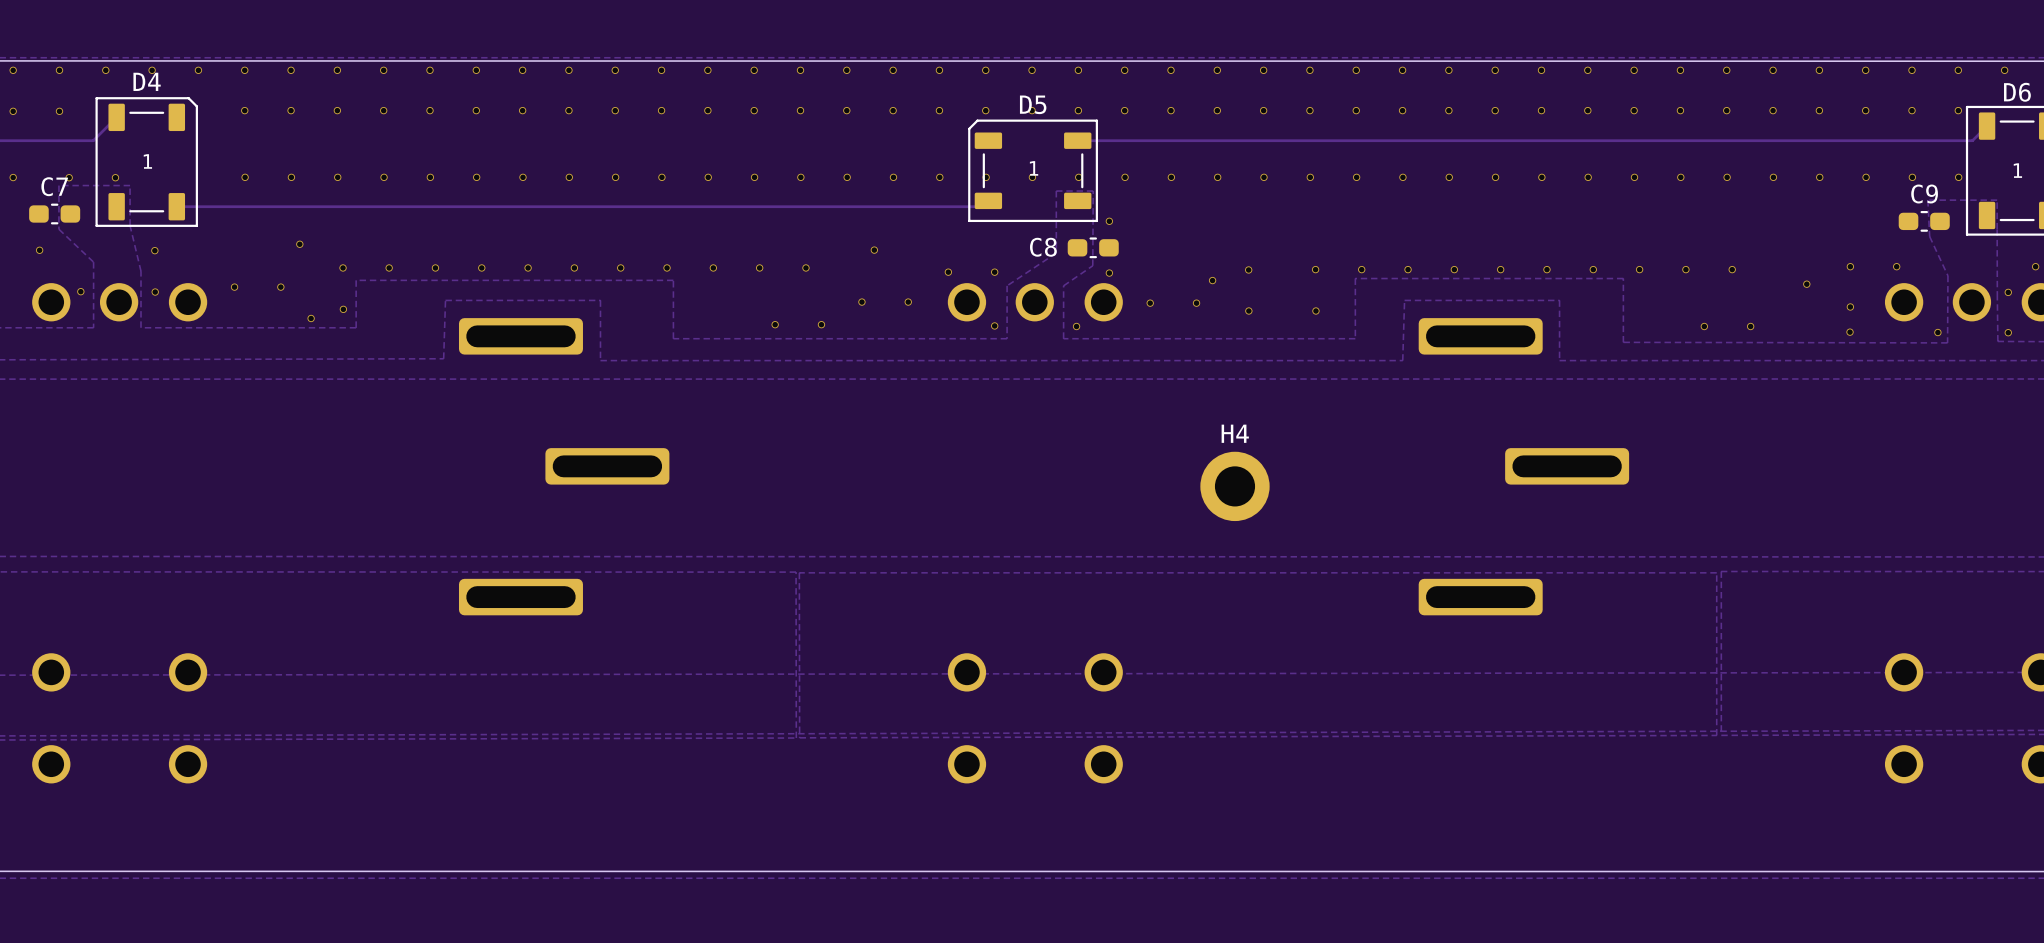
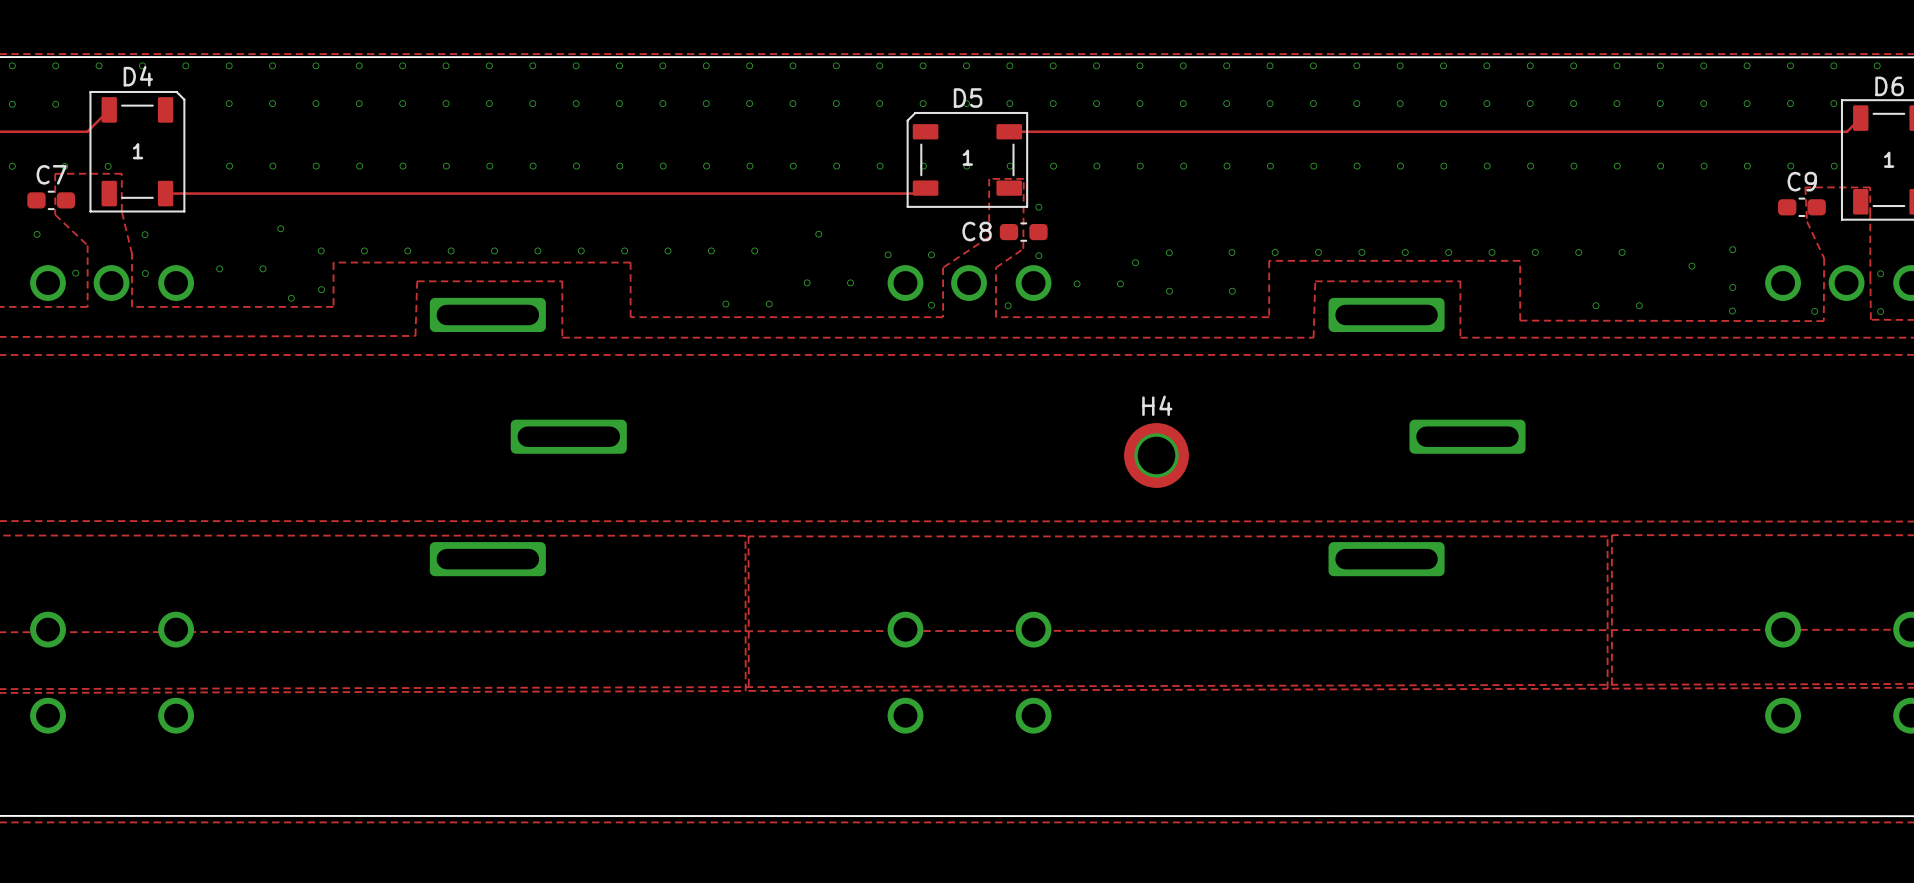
via: (1896, 266) -> none
via: (2035, 266) -> none

